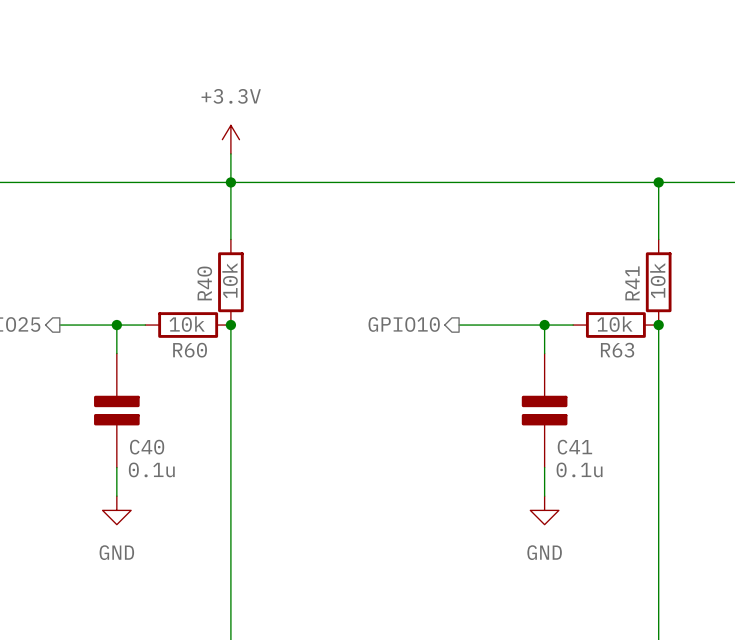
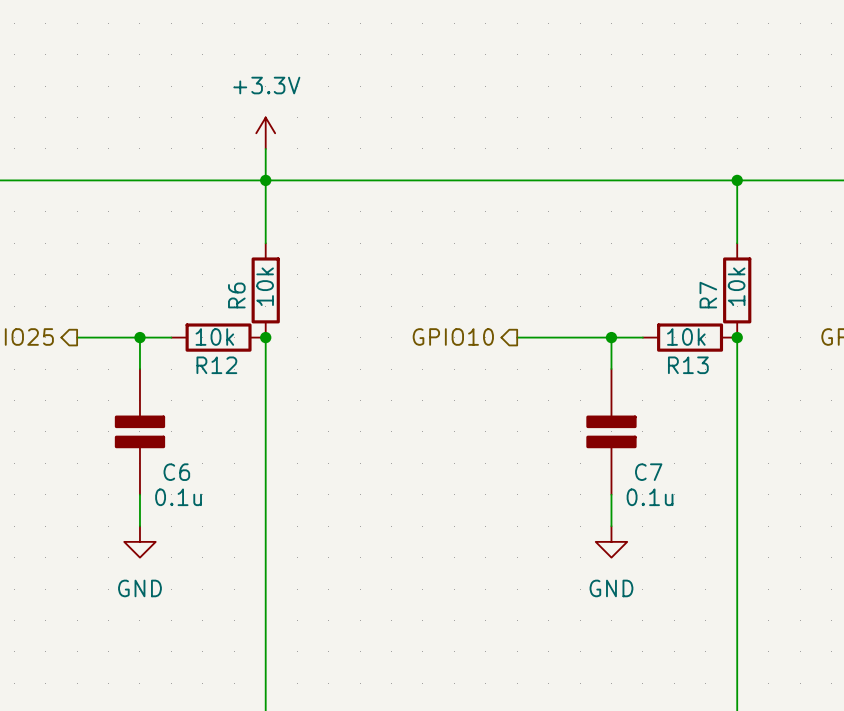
R40 name: R40 (204, 283) -> R6 (236, 295)
R41 name: R41 (632, 283) -> R7 (708, 295)
R60 name: R60 (190, 350) -> R12 (216, 365)
R63 name: R63 (617, 350) -> R13 (688, 365)
C40 name: C40 (147, 447) -> C6 (176, 472)
C41 name: C41 (574, 447) -> C7 (648, 472)

